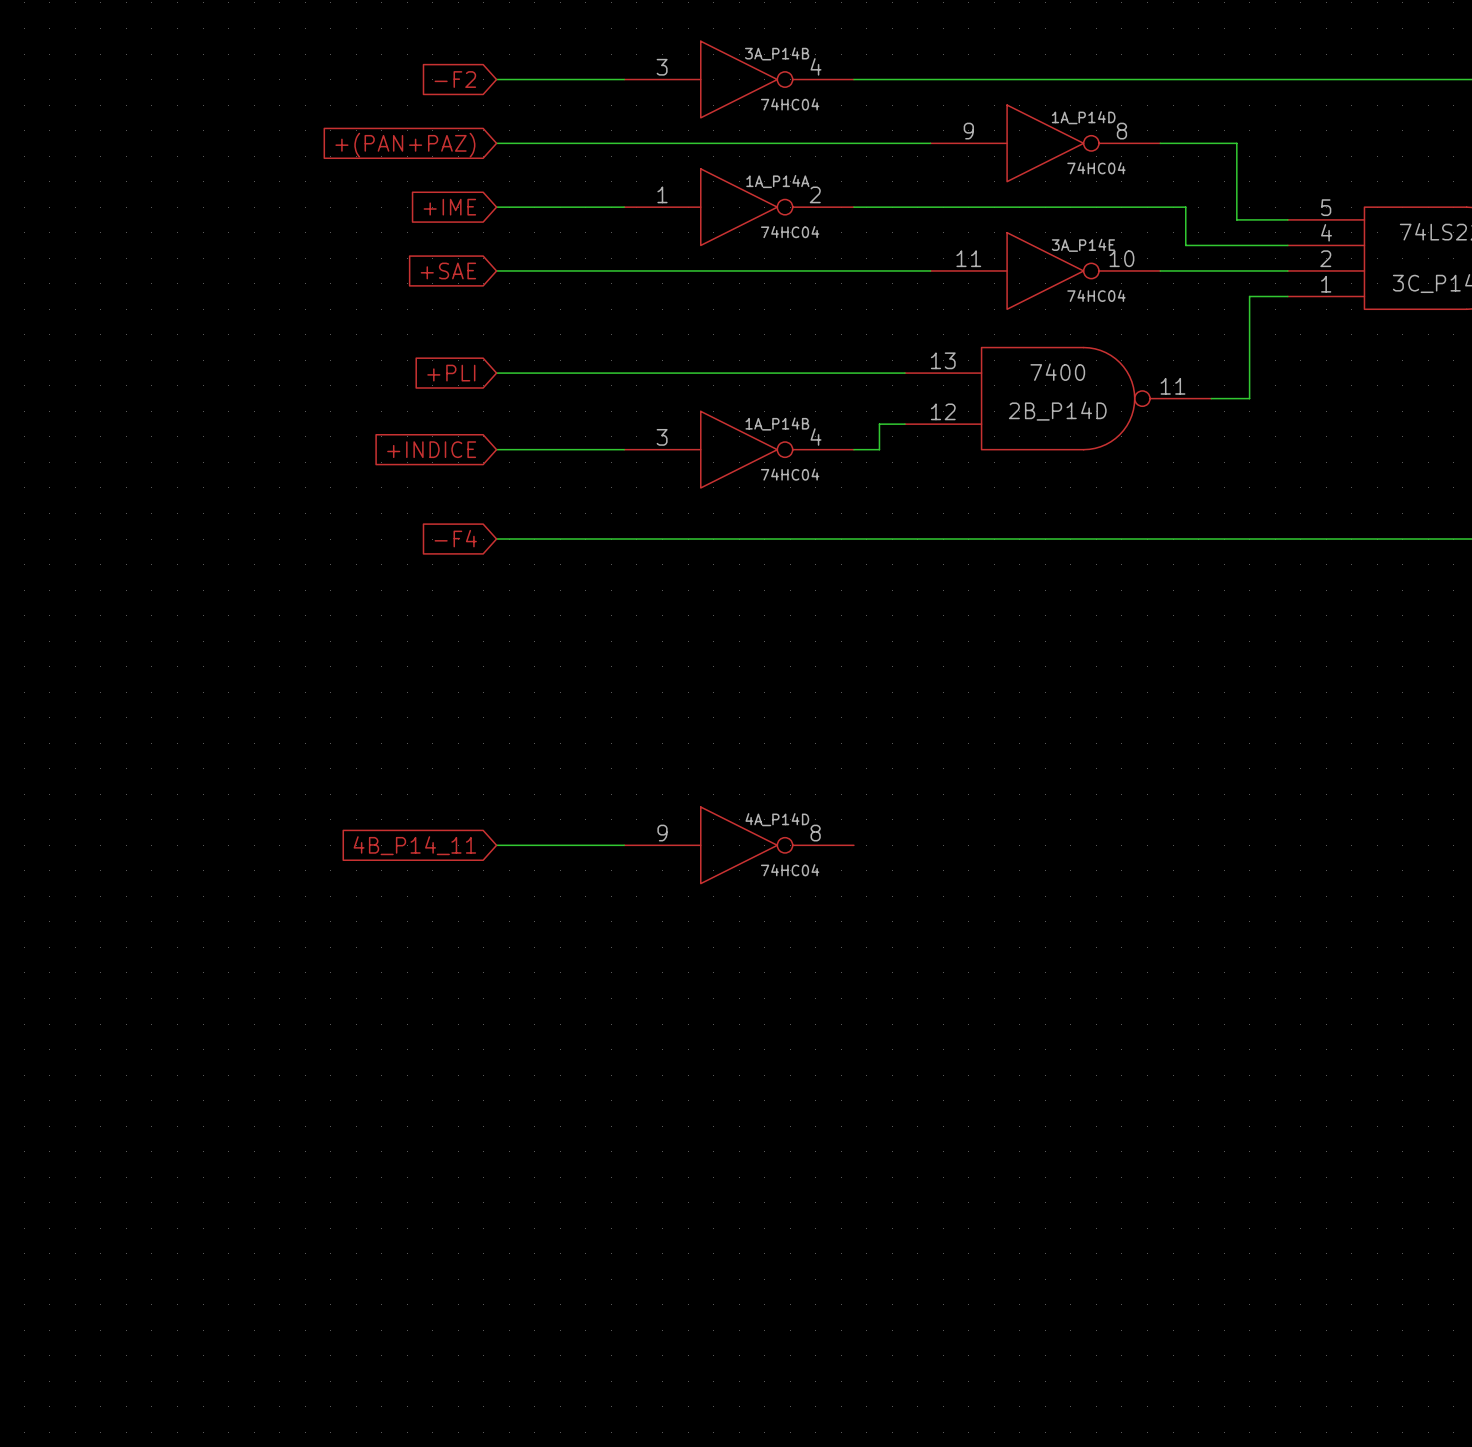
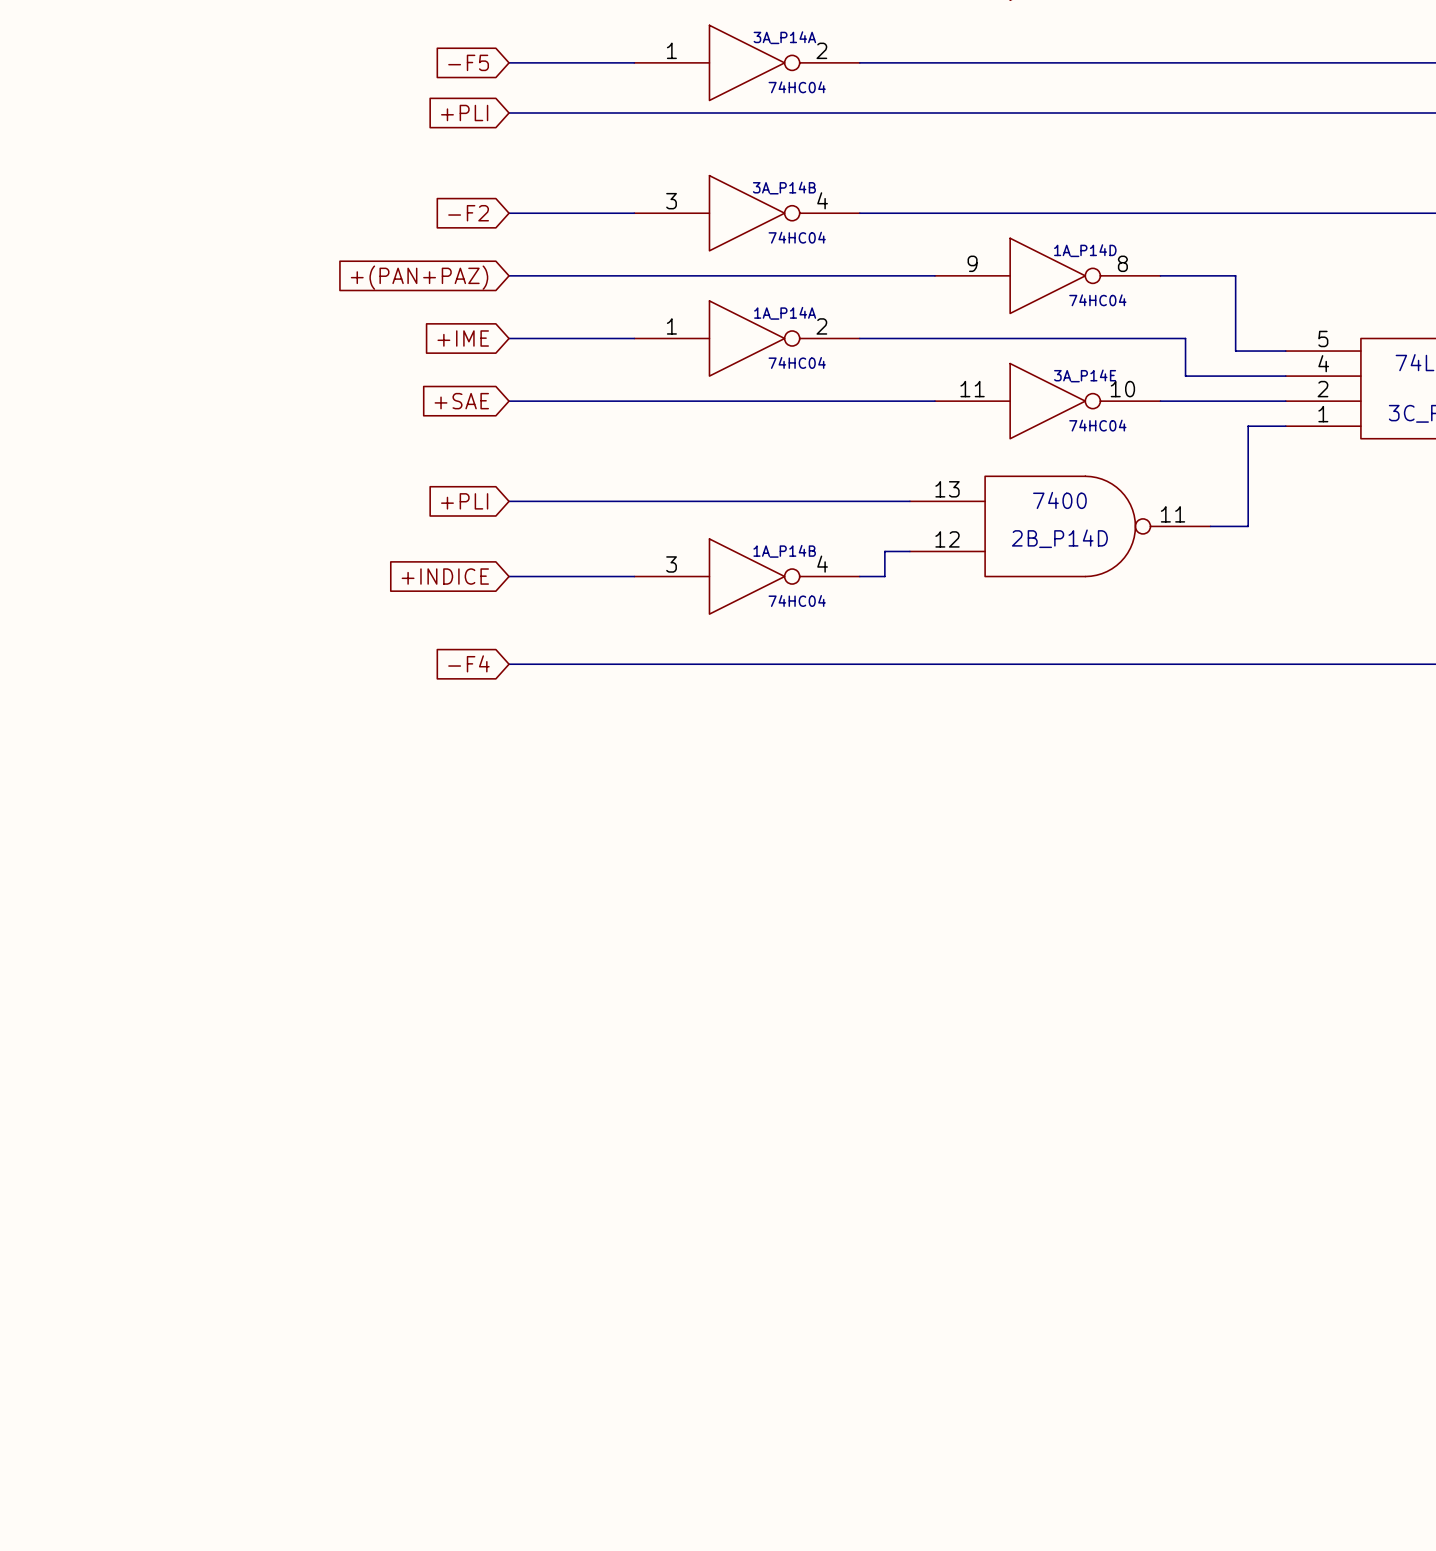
global label: 4B_P14_11 (414, 845) -> none
wire: (496, 845) (624, 845) -> none
4A_P14D: 74HC04 (739, 845) -> none

